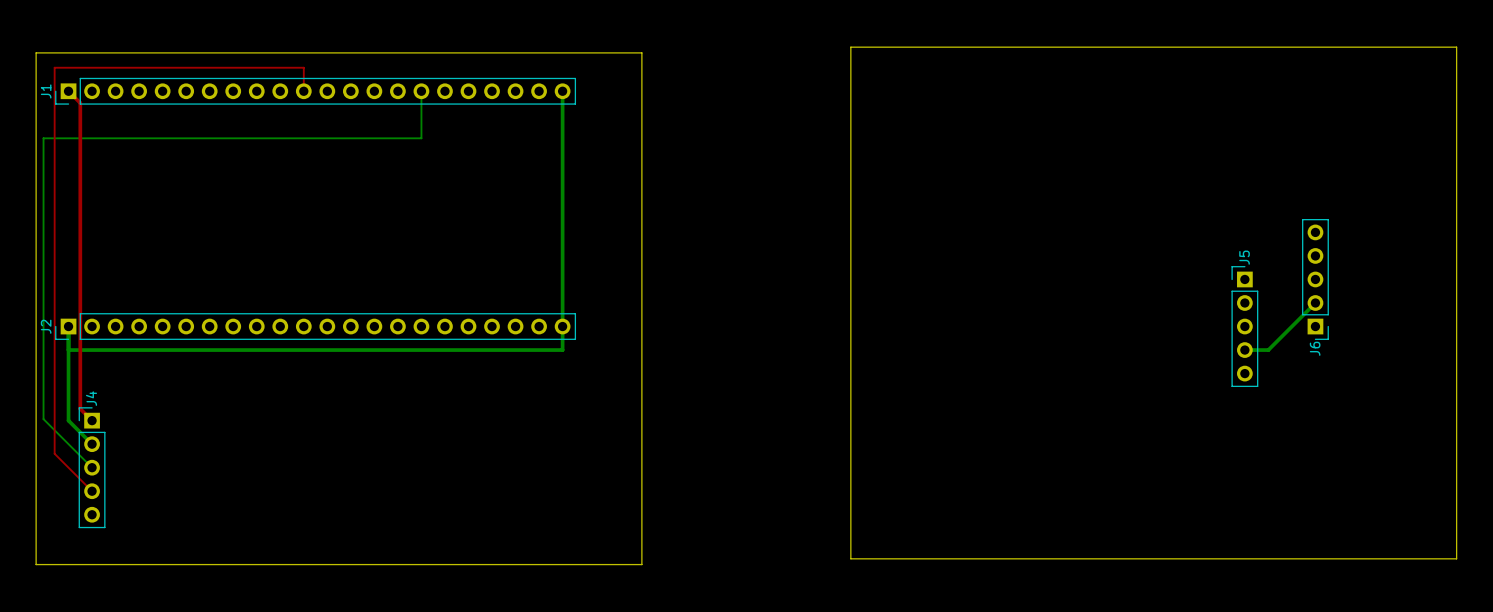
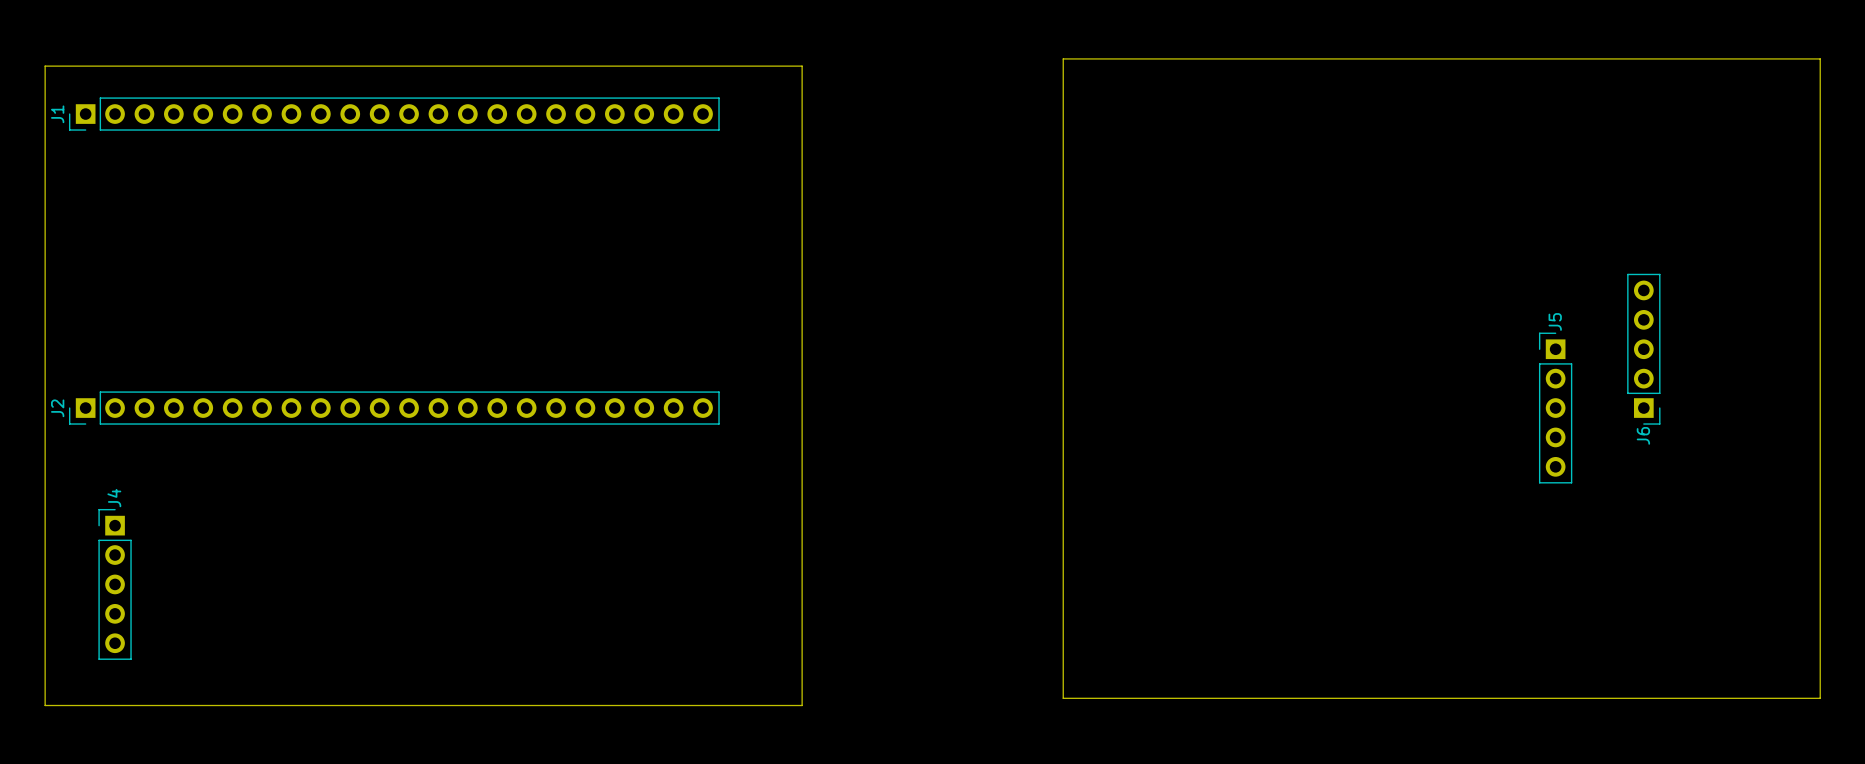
top track: (68, 91) (80, 103) (80, 408) (92, 420) -> none
top track: (303, 91) (303, 67) (54, 67) (54, 453) (92, 491) -> none
bottom track: (421, 91) (421, 138) (43, 138) (43, 419) (92, 467) -> none
bottom track: (562, 91) (562, 350) (68, 350) -> none
bottom track: (1315, 303) (1268, 350) (1244, 350) -> none
bottom track: (68, 326) (68, 420) (92, 444) -> none

